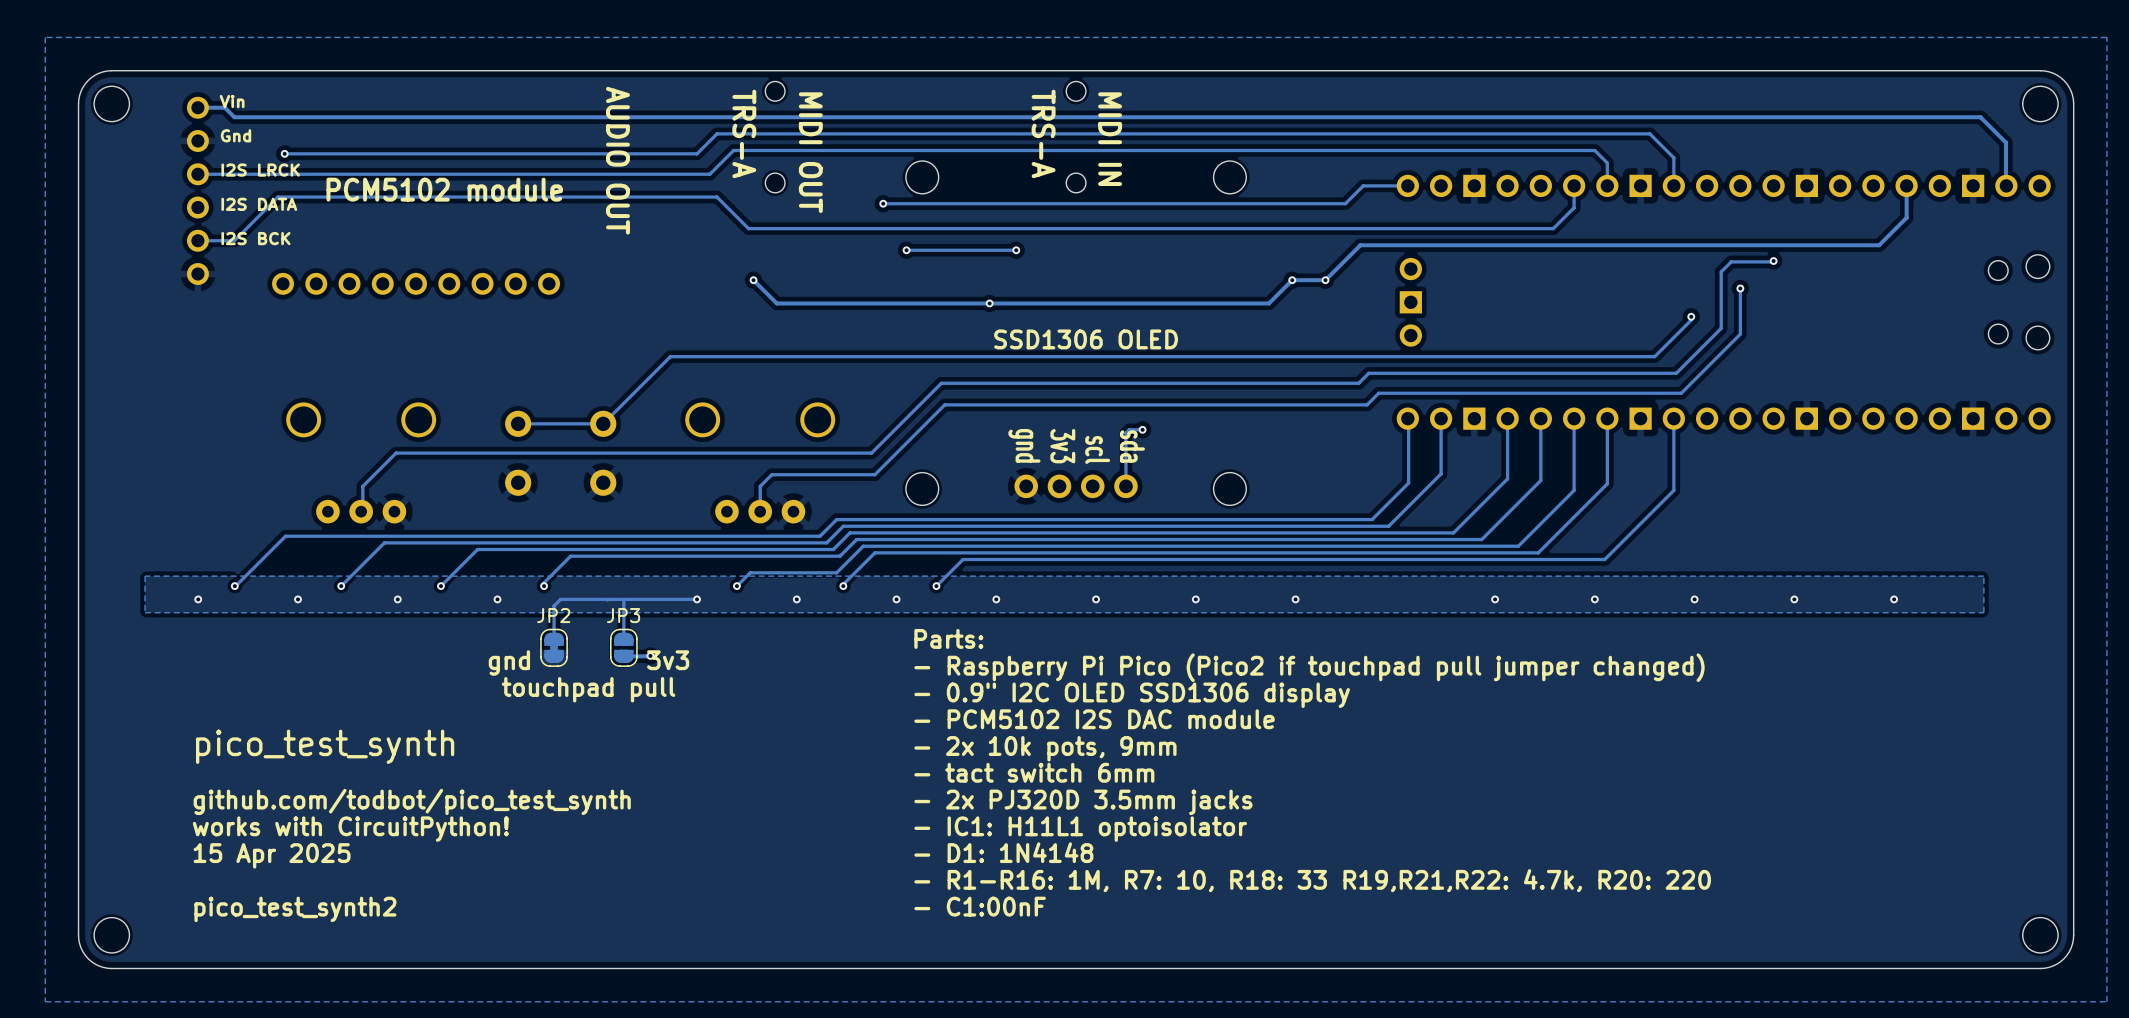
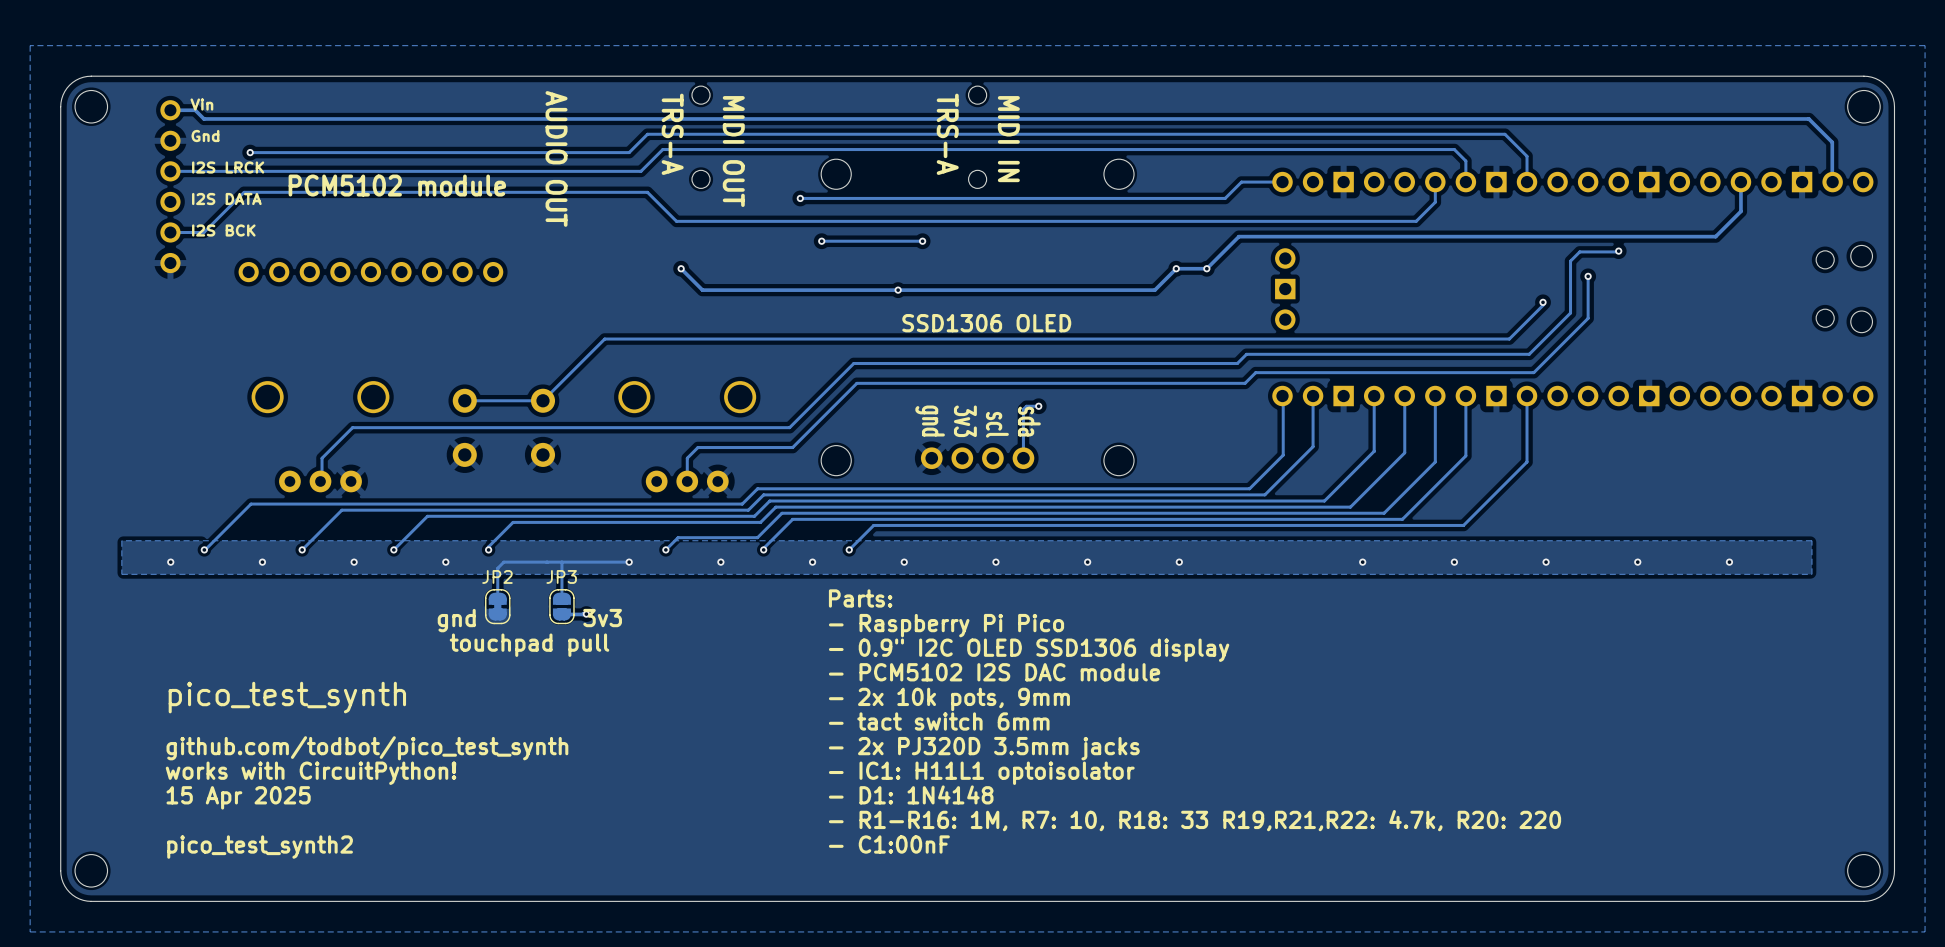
text: - Raspberry Pi Pico (Pico2 if touchpad pull jumper changed) (1309, 667) -> - Raspberry Pi Pico (946, 625)

